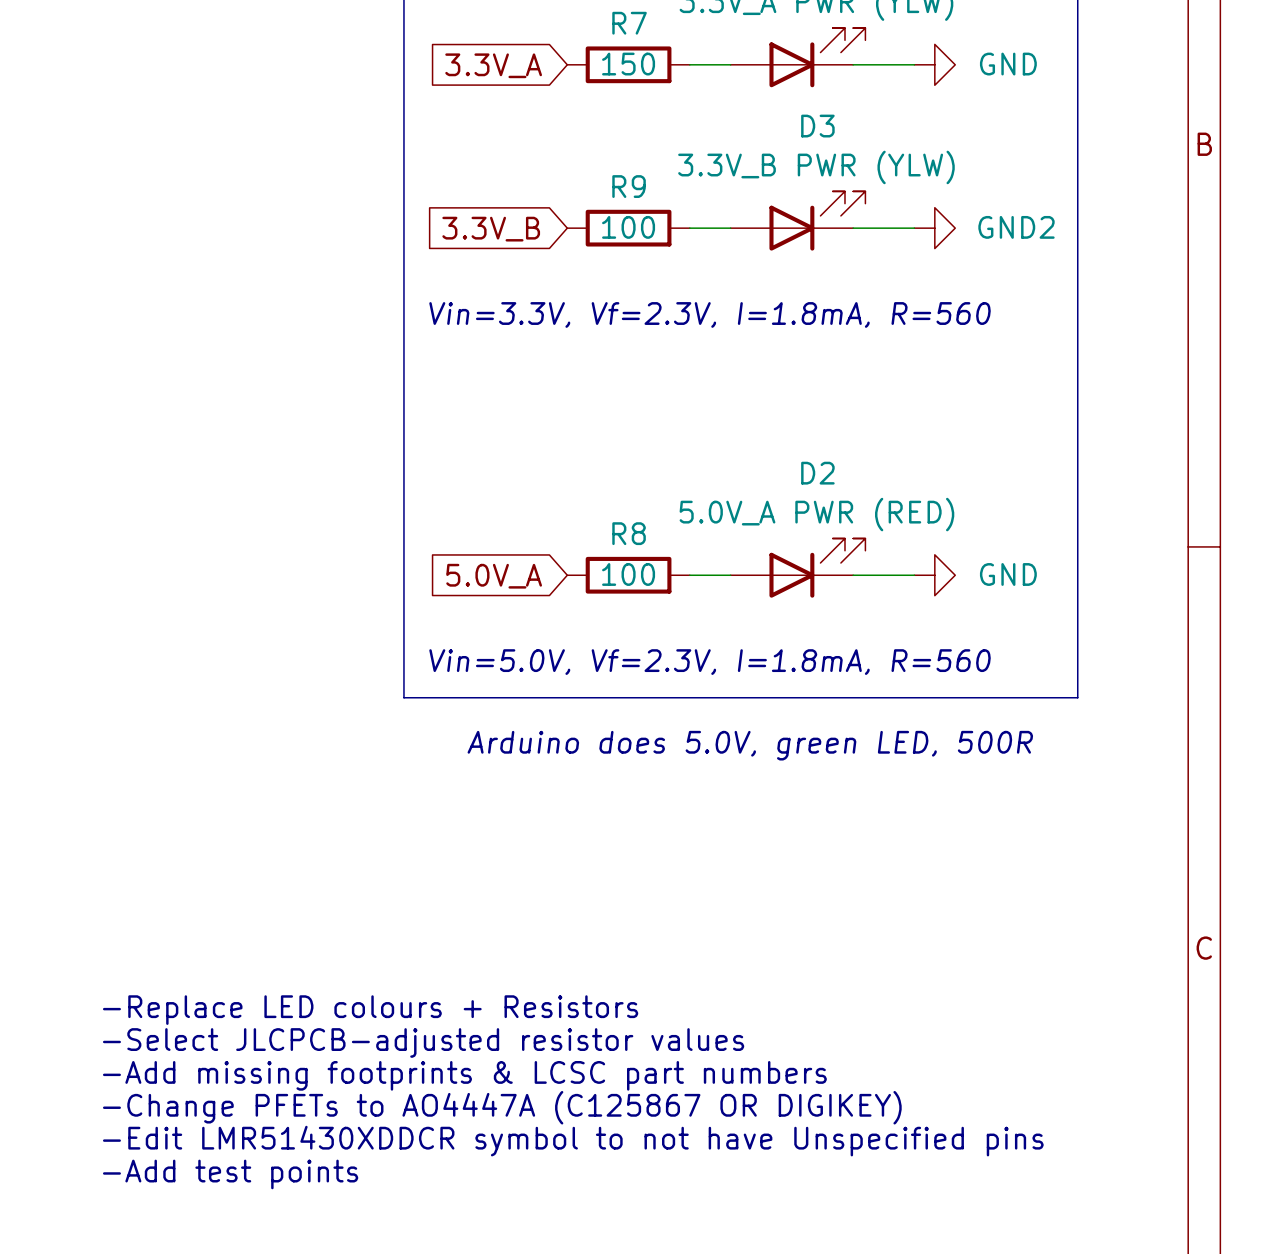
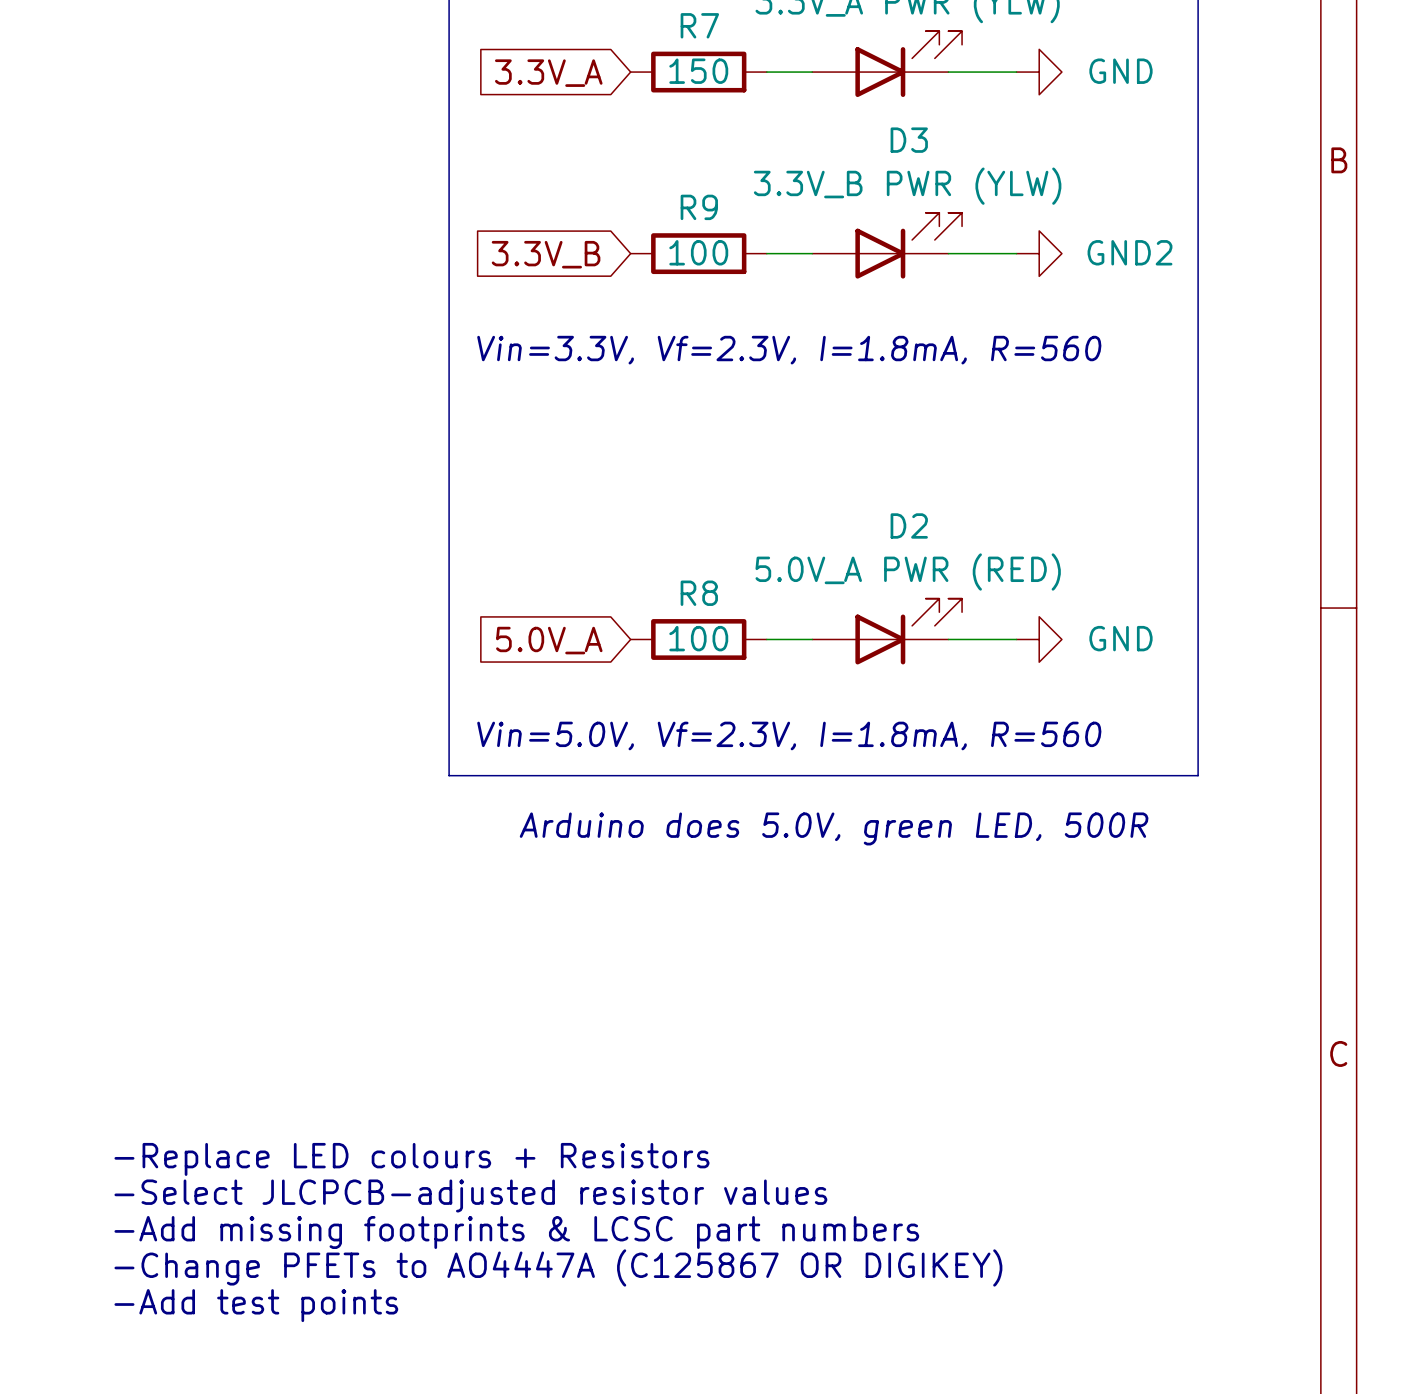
text: -Replace LED colours + Resistors (370, 1010) -> none
text: -Select JLCPCB-adjusted resistor values (423, 1042) -> -Replace LED colours + Resistors (411, 1159)
text: -Add missing footprints & LCSC part numbers (464, 1075) -> -Select JLCPCB-adjusted resistor values (470, 1195)
text: -Change PFETs to AO4447A (C125867 OR DIGIKEY) (502, 1107) -> -Add missing footprints & LCSC part numbers (516, 1232)
text: -Edit LMR51430XDDCR symbol to not have Unspecified pins (573, 1141) -> -Change PFETs to AO4447A (C125867 OR DIGIKEY) (558, 1267)

